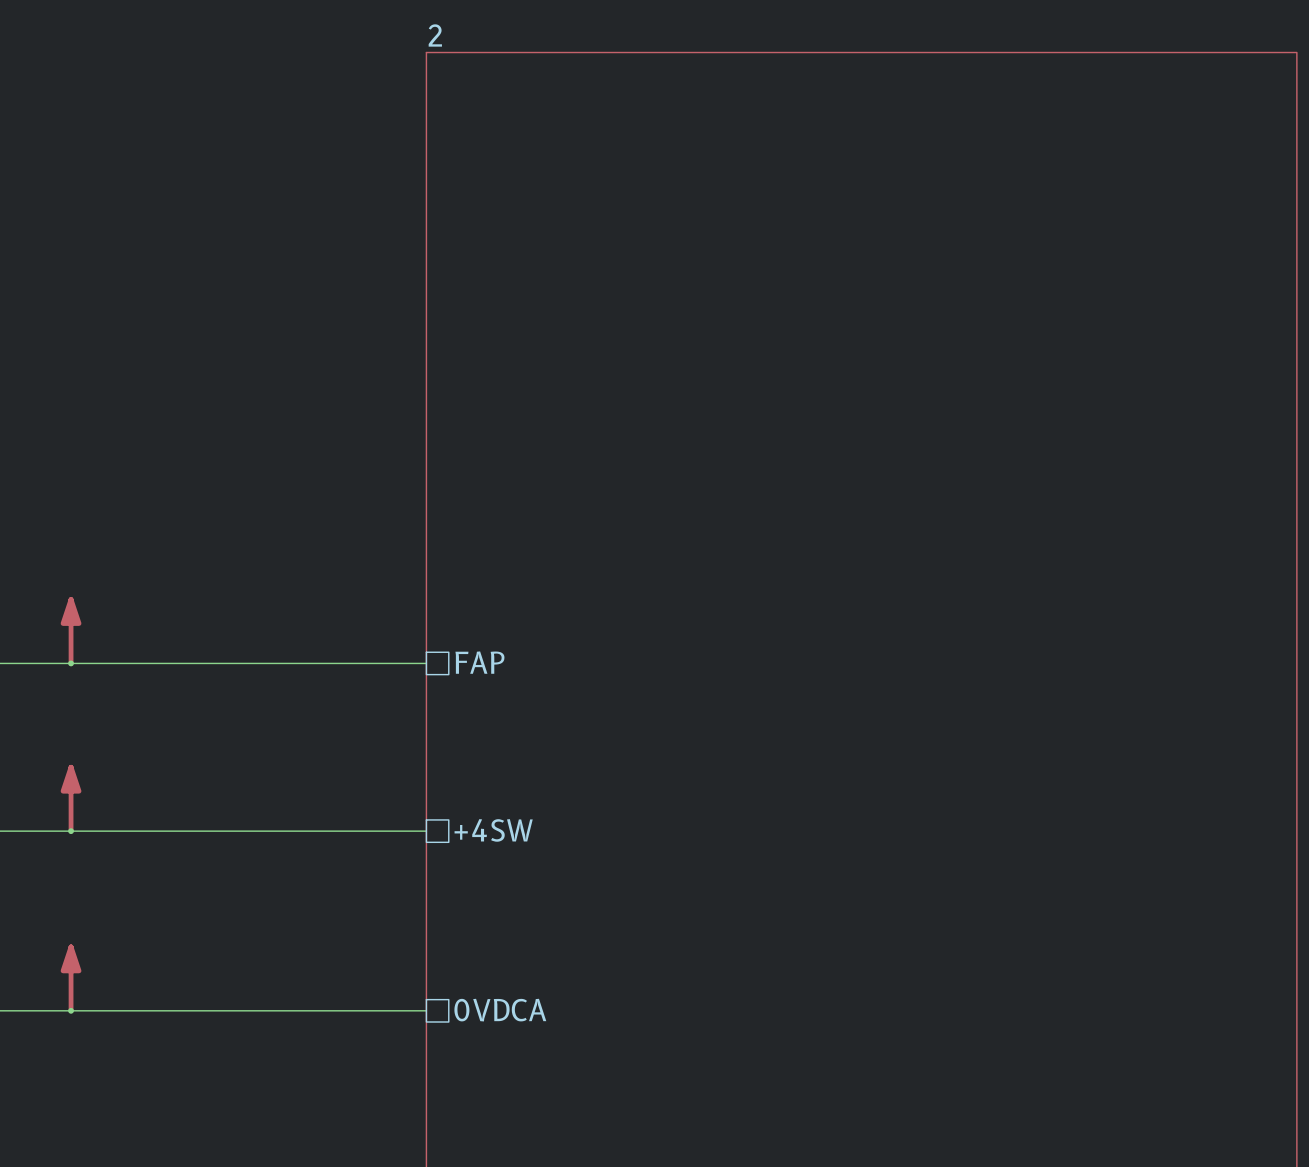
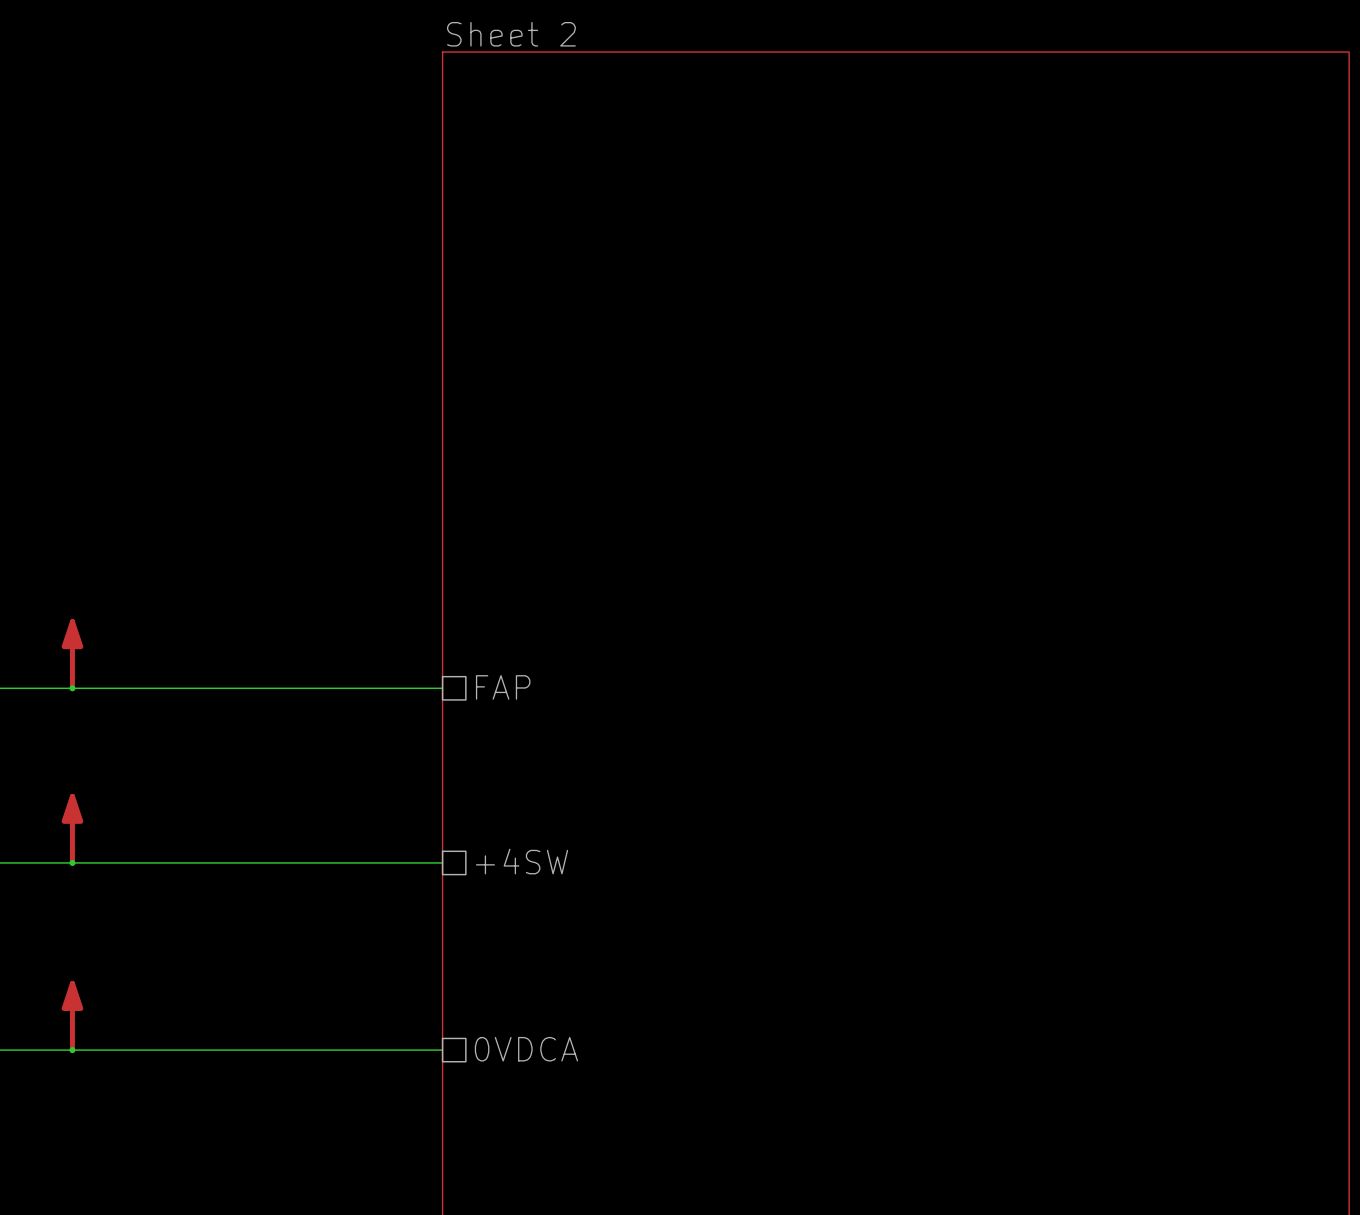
sheet 2 name: 2 (435, 35) -> Sheet 2 (511, 34)

